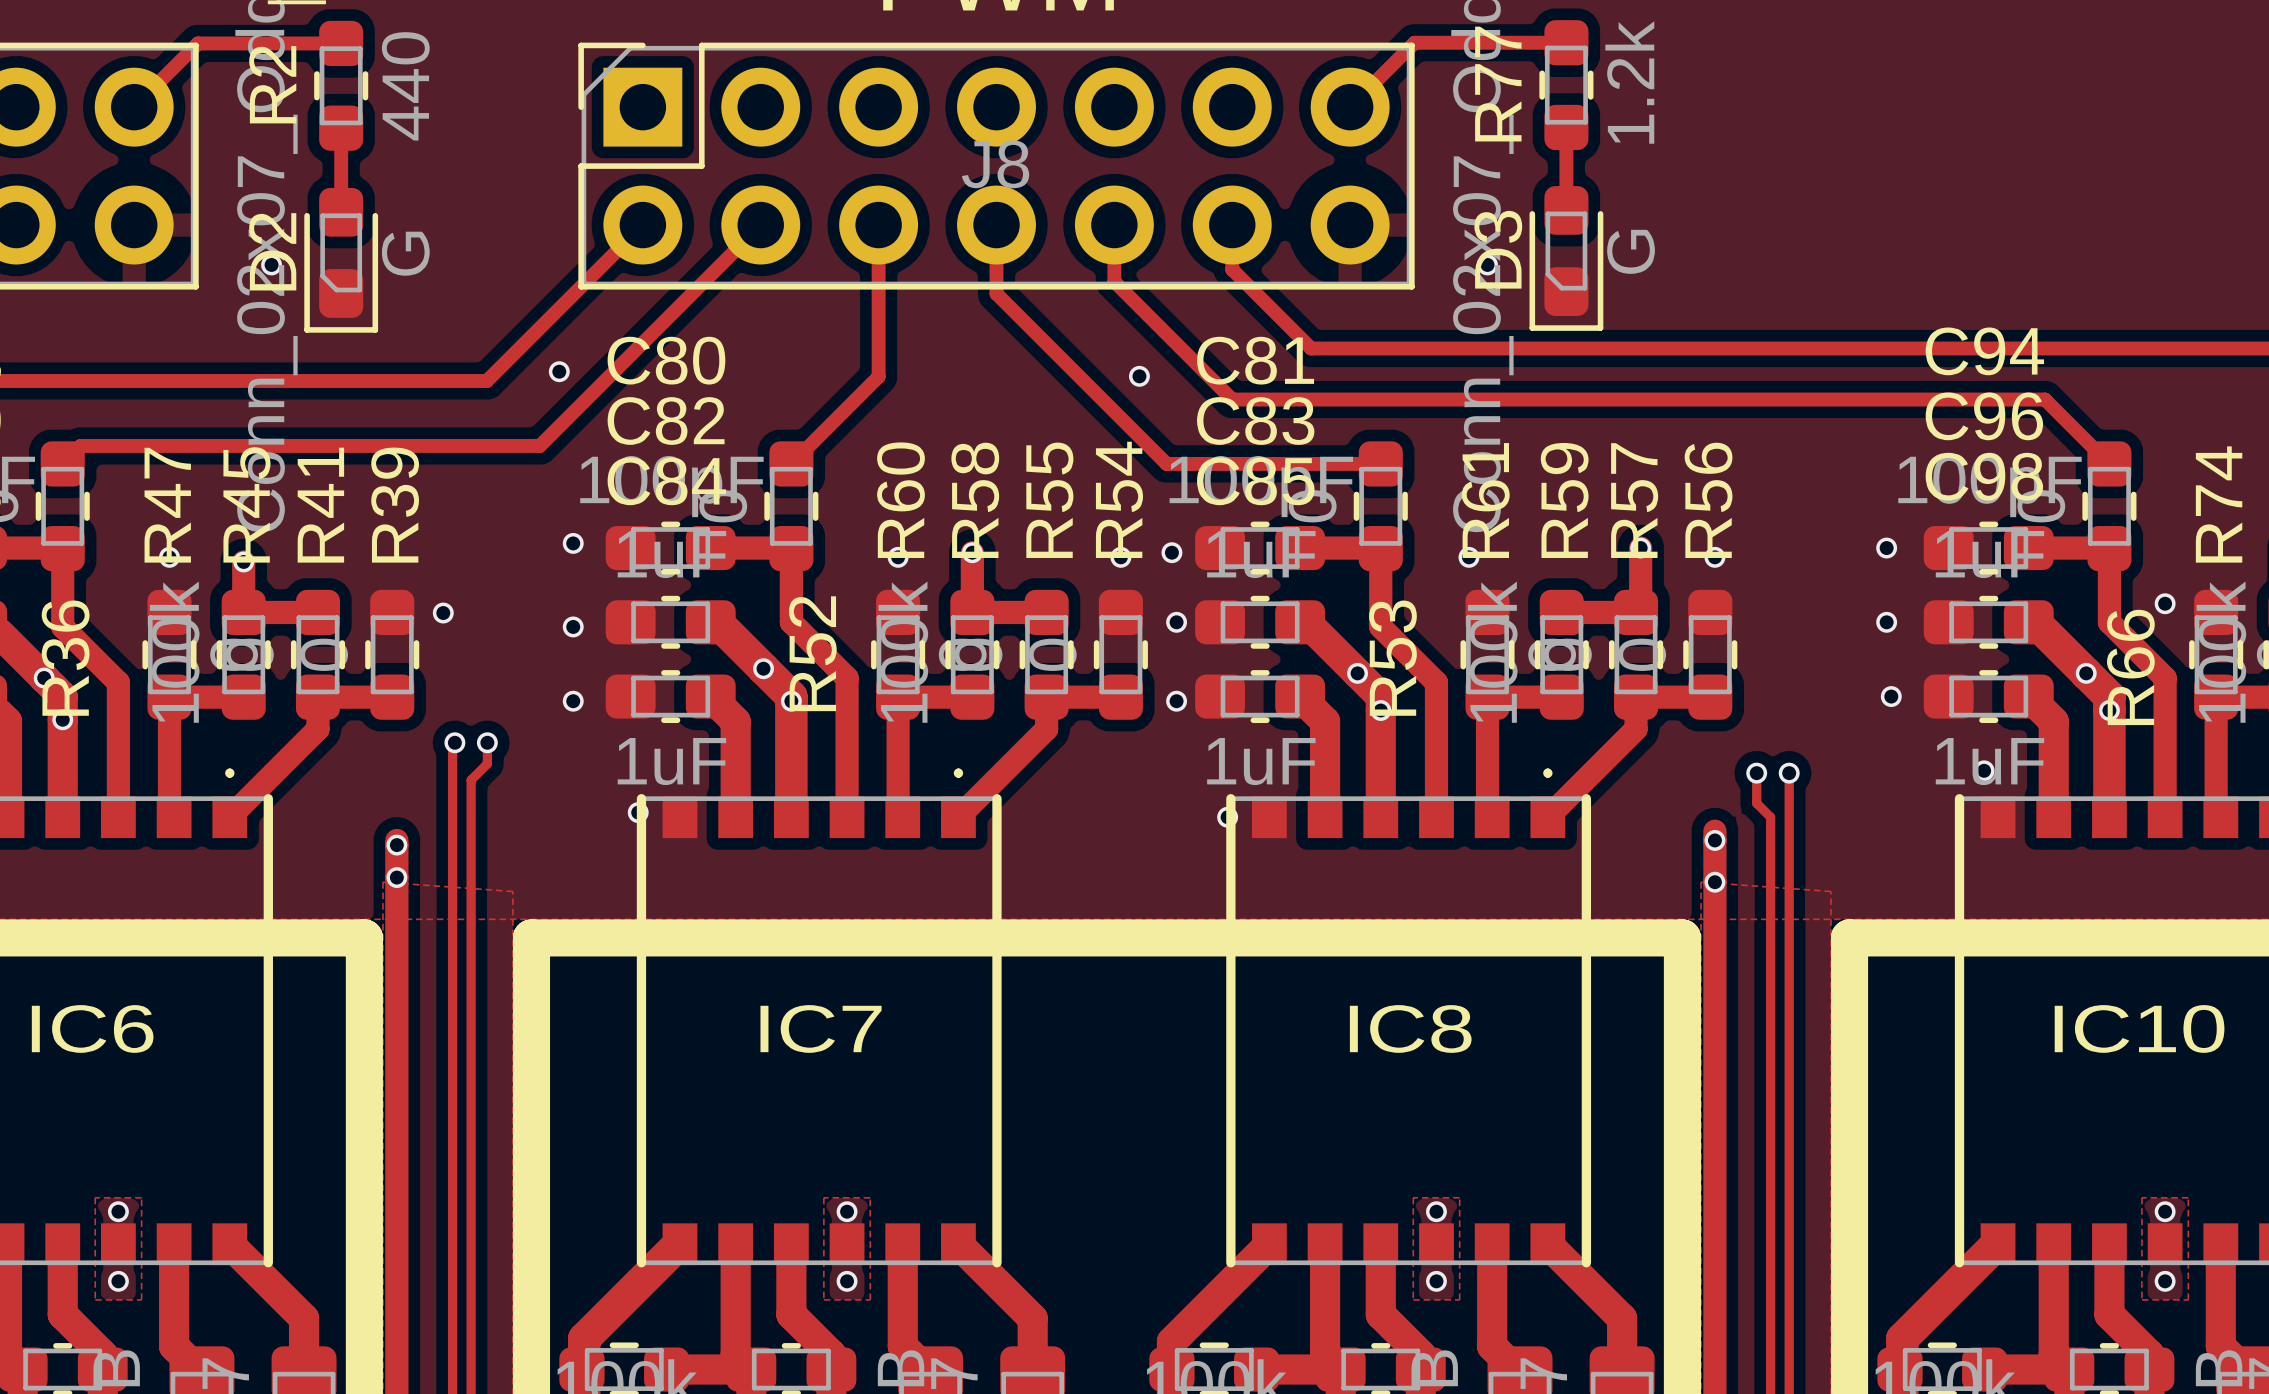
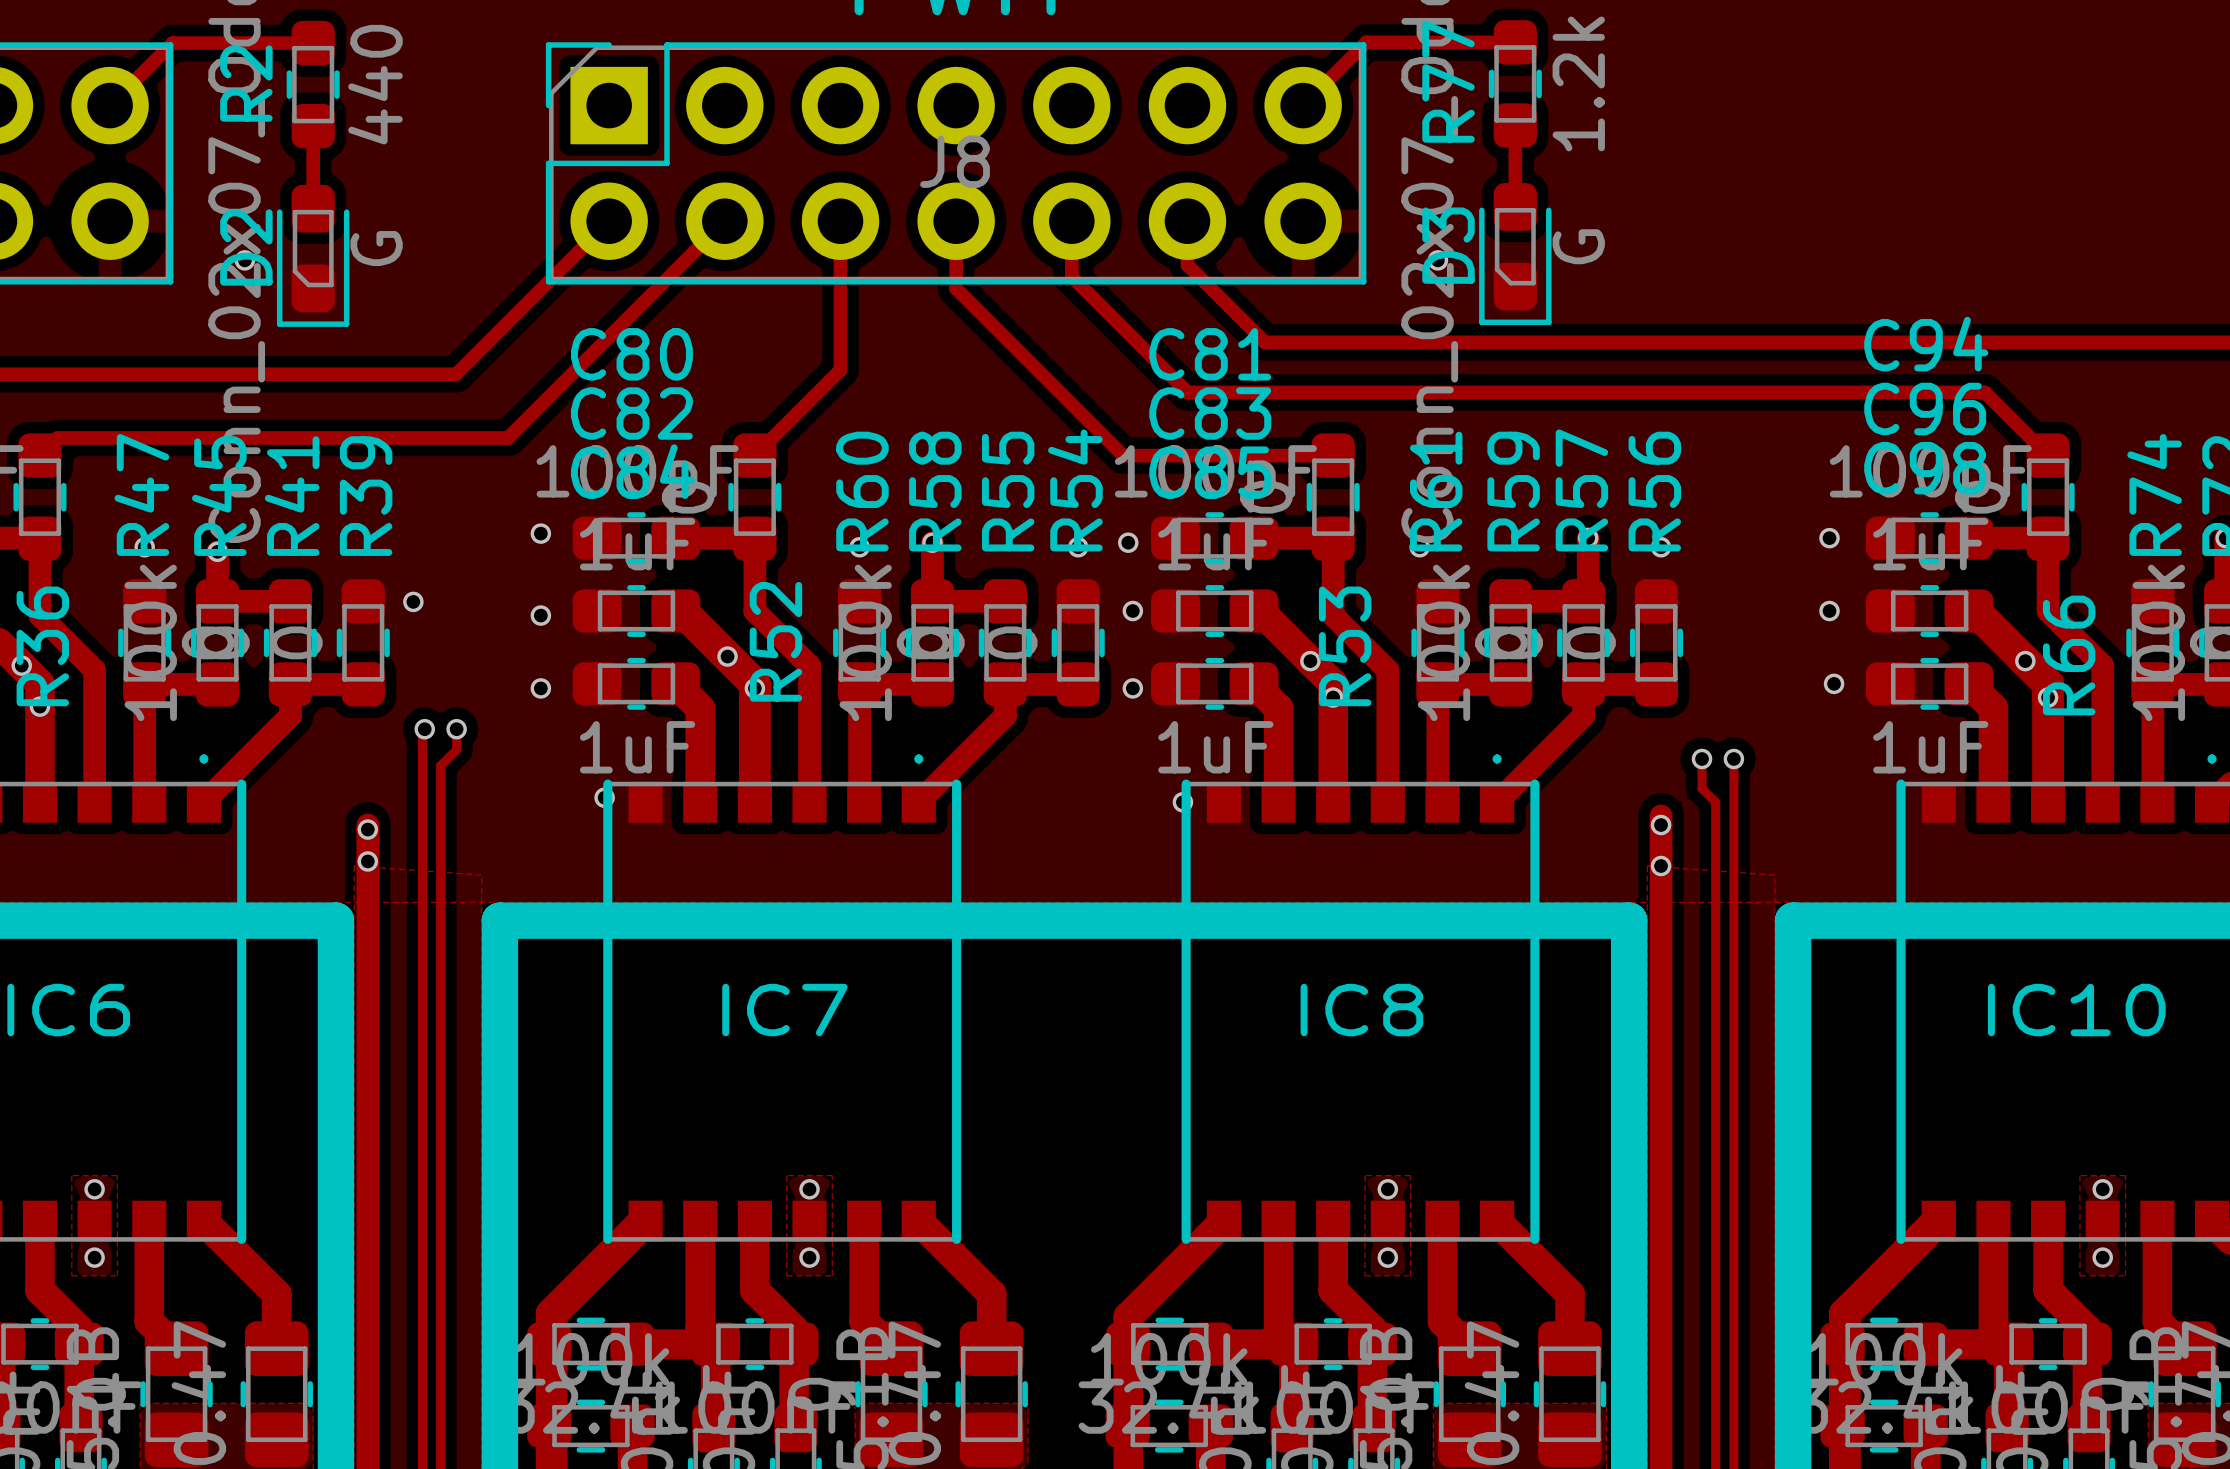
via: (559, 371) -> none
via: (1139, 376) -> none
via: (2165, 603) -> none
via: (1984, 770) -> none

